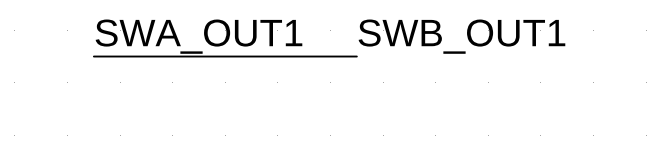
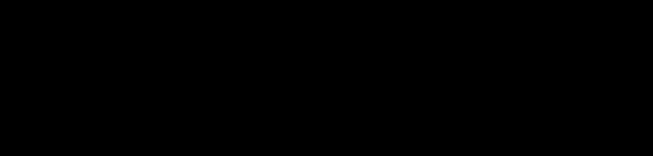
label: SWA_OUT1 (198, 36) -> none
label: SWB_OUT1 (461, 36) -> none
wire: (93, 56) (356, 56) -> none

